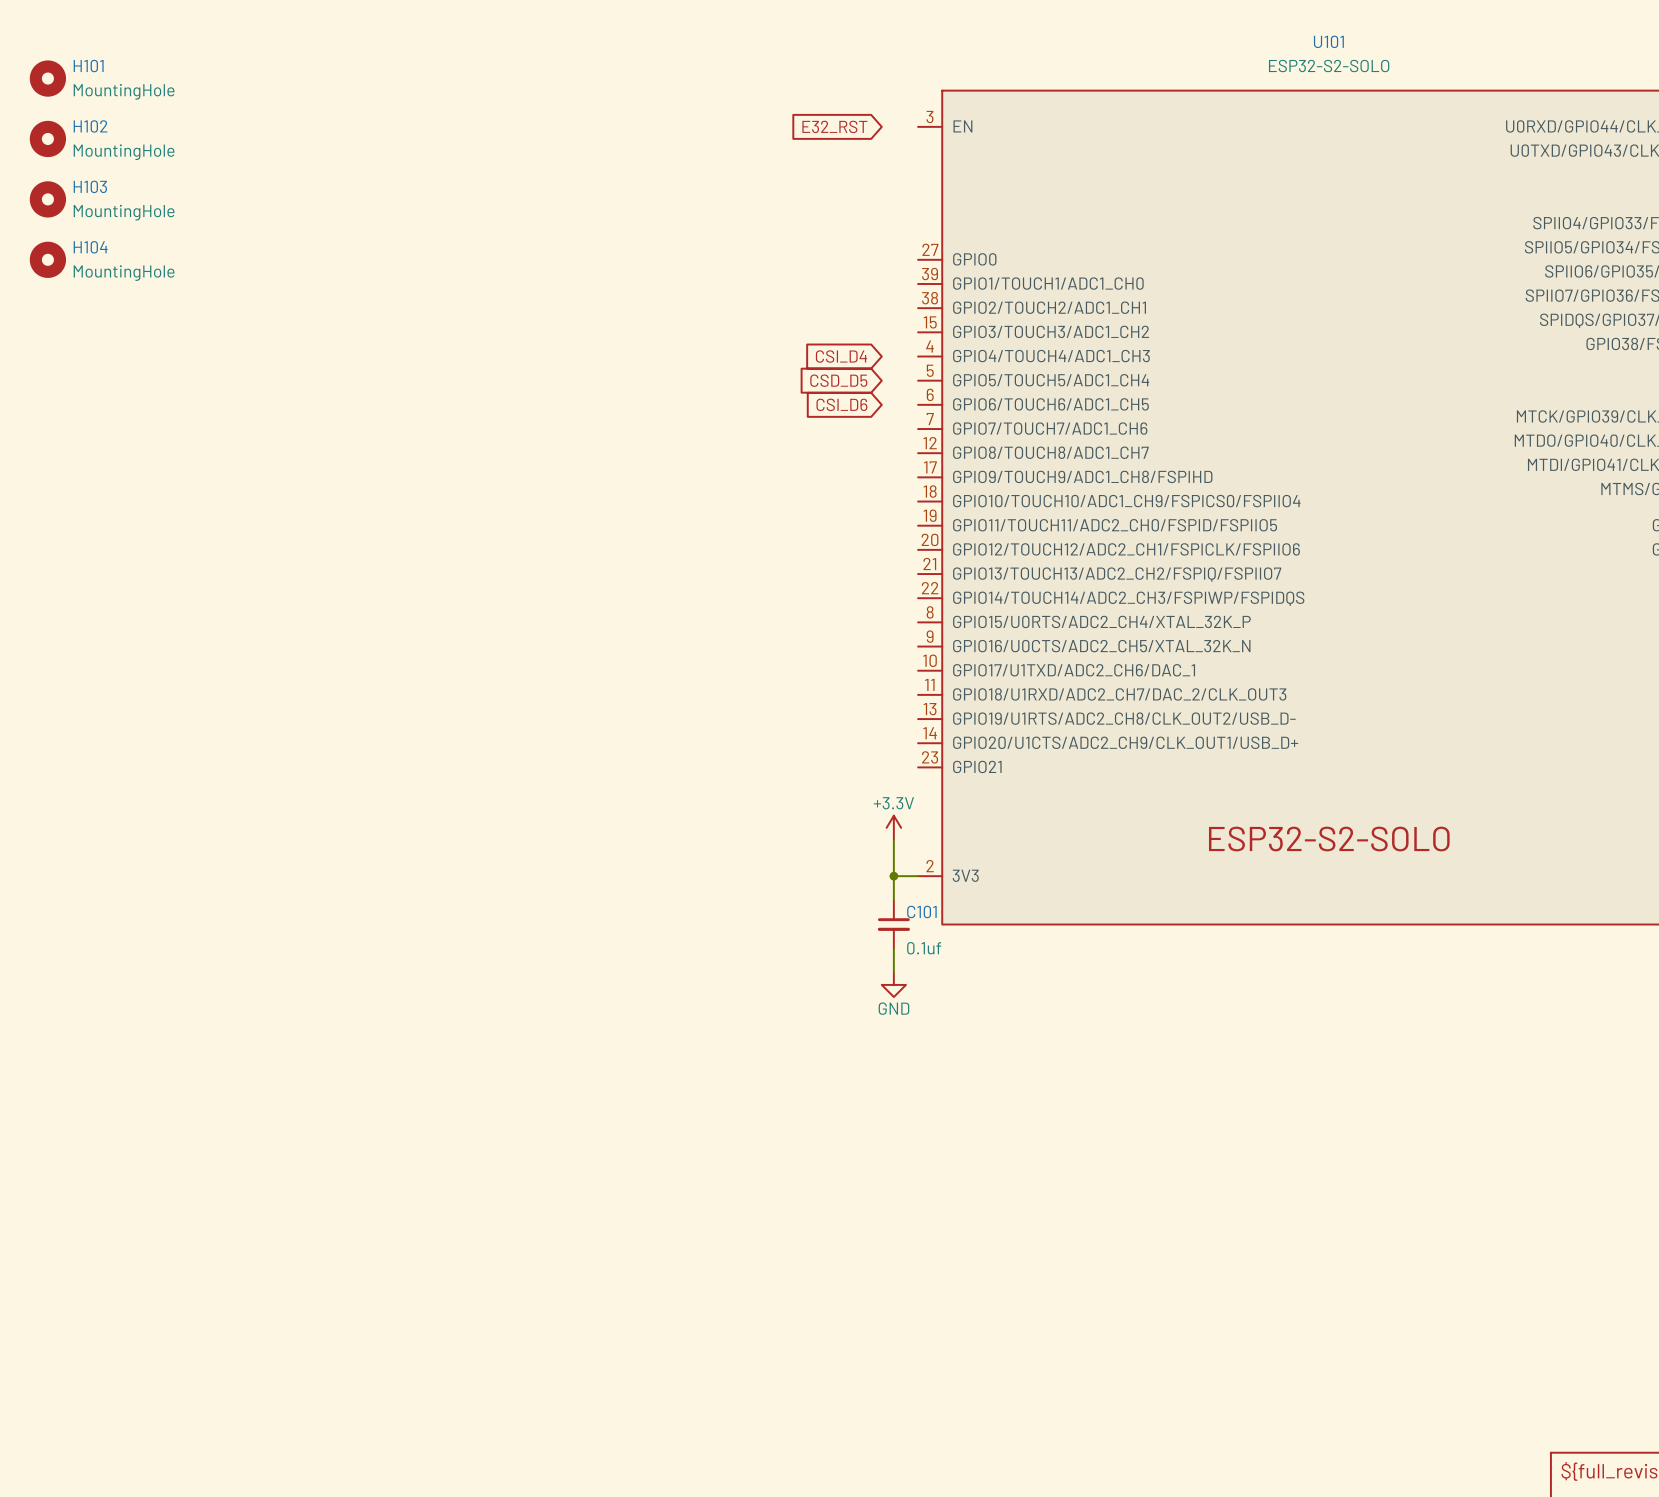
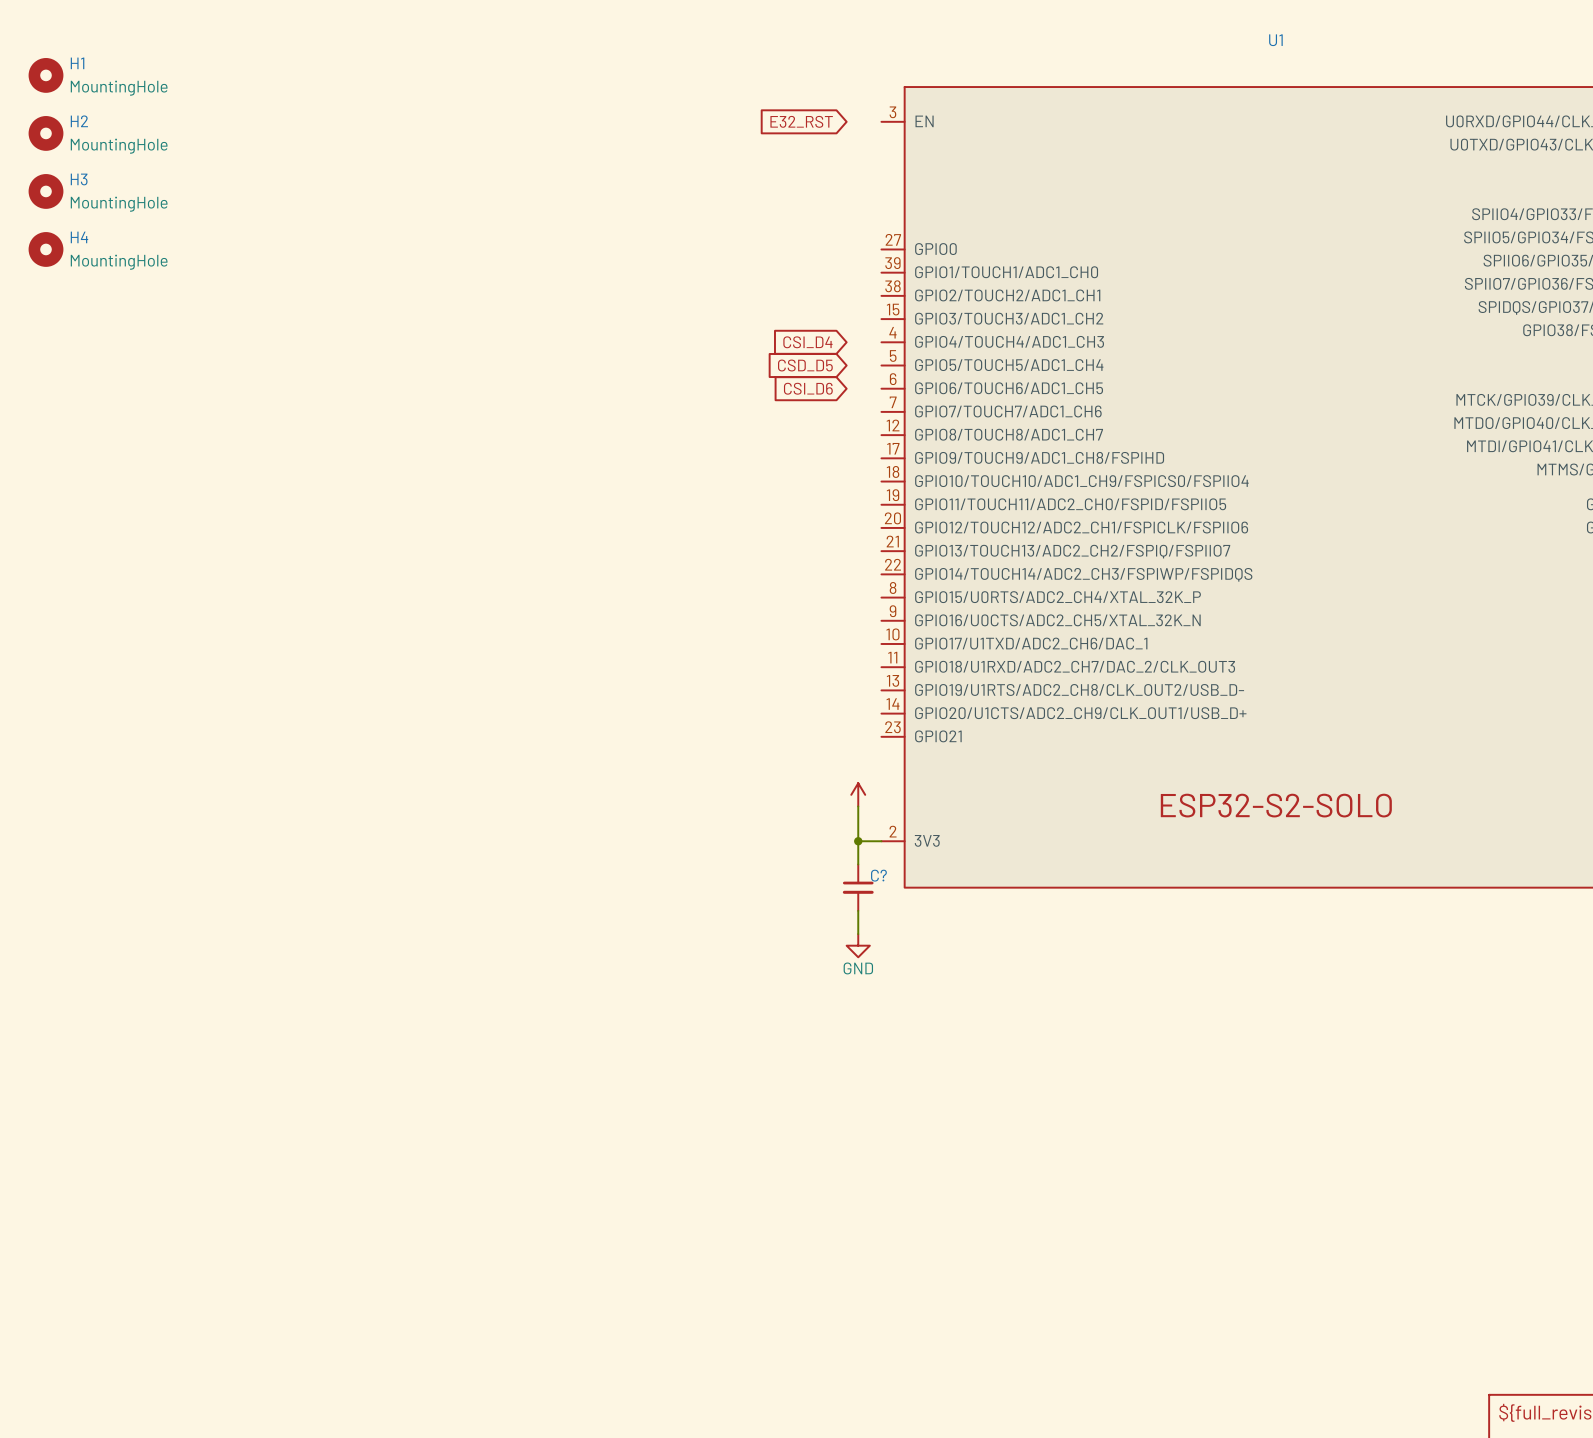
U101 name: U101 (1328, 41) -> U1 (1275, 40)
H101 name: H101 (88, 66) -> H1 (77, 63)
U101 value: ESP32-S2-SOLO (1329, 66) -> none
H102 name: H102 (90, 126) -> H2 (79, 121)
H103 name: H103 (90, 186) -> H3 (79, 179)
H104 name: H104 (90, 247) -> H4 (79, 237)
power symbol text: +3.3V (893, 803) -> none
C101 name: C101 (921, 911) -> C? (878, 875)
C101 value: 0.1uf (924, 948) -> none

